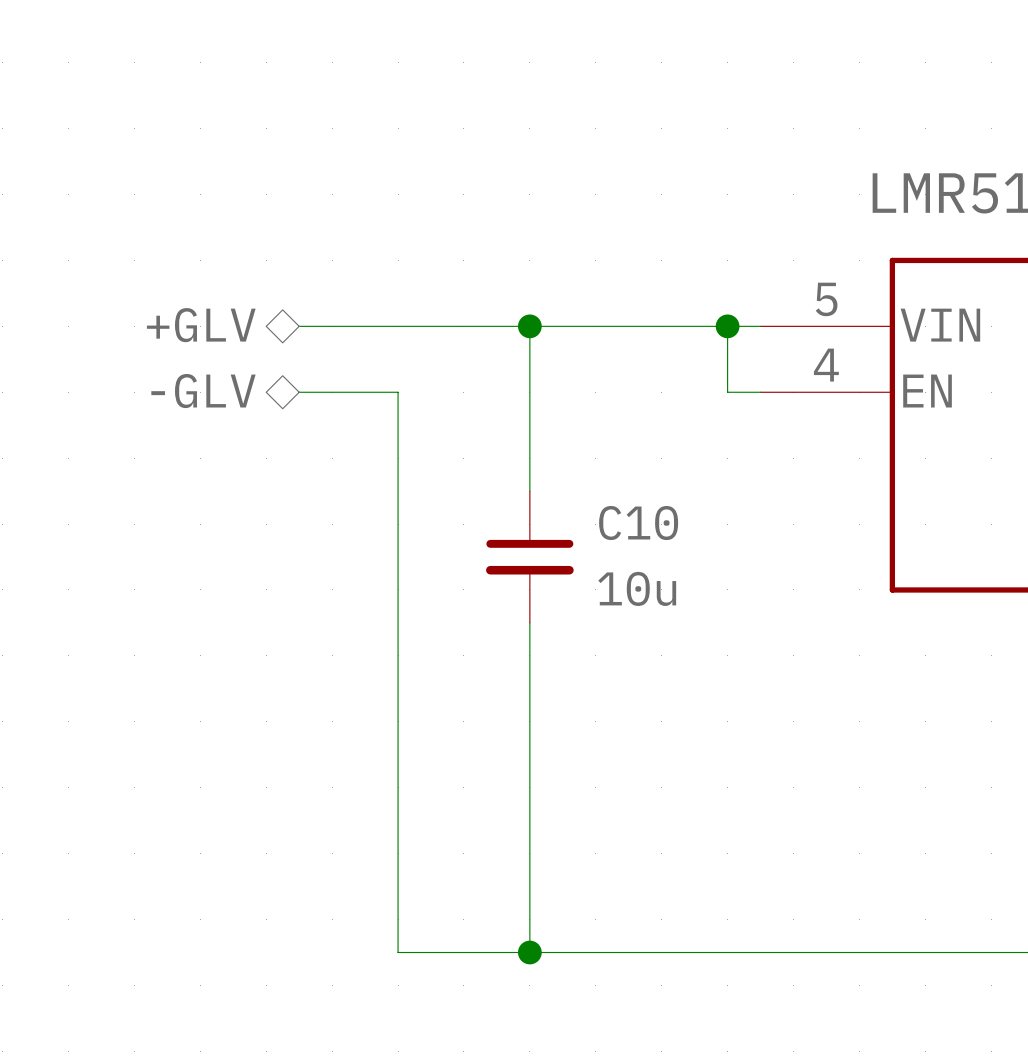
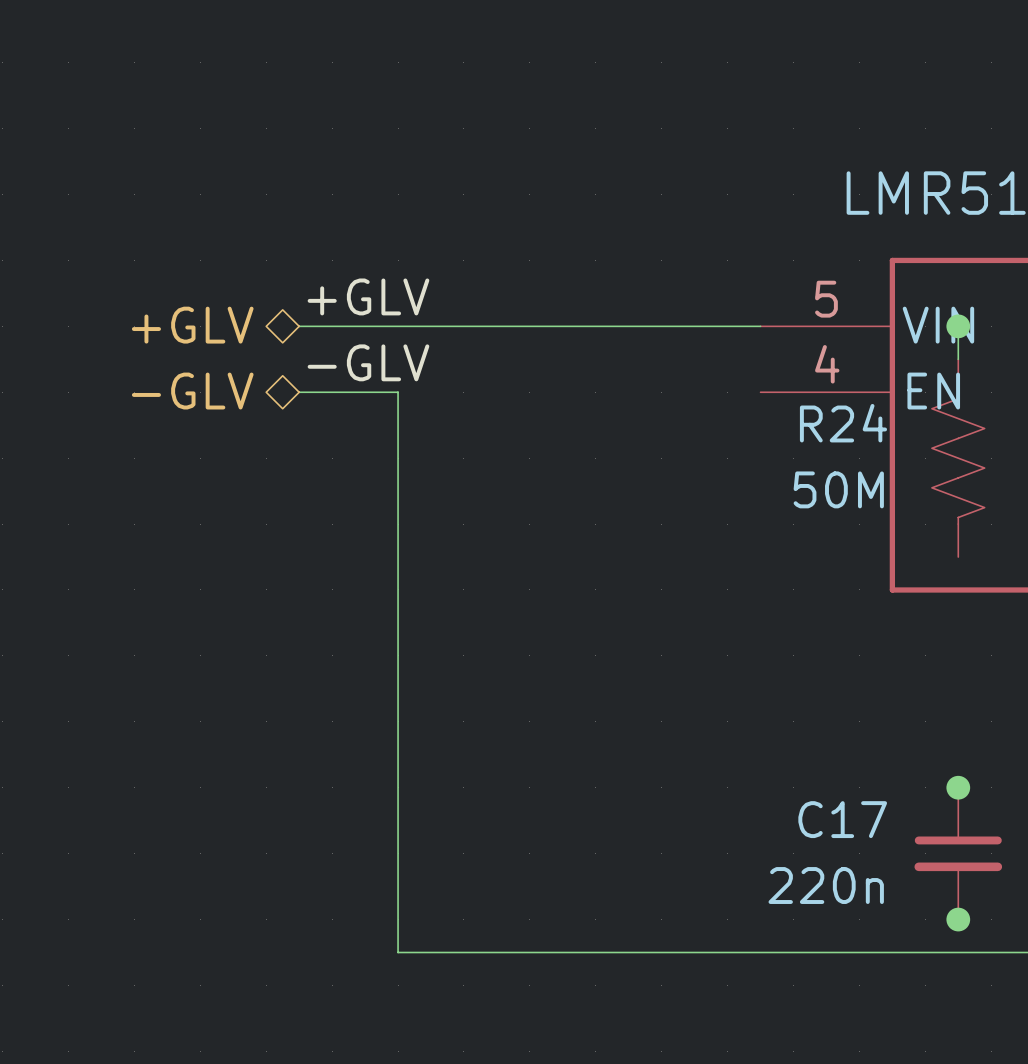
label: none -> +GLV (368, 296)
wire: (529, 326) (529, 491) -> none
junction: (529, 326) -> none
wire: (727, 326) (727, 392) (760, 392) -> none
junction: (727, 326) -> none
wire: none -> (958, 326) (958, 359)
junction: none -> (958, 326)
label: none -> -GLV (368, 362)
R24: none -> 50M (958, 458)
C10: 10u (529, 557) -> none
wire: (529, 622) (529, 952) -> none
junction: none -> (958, 787)
C17: none -> 220n (958, 853)
junction: none -> (958, 919)
junction: (529, 952) -> none

